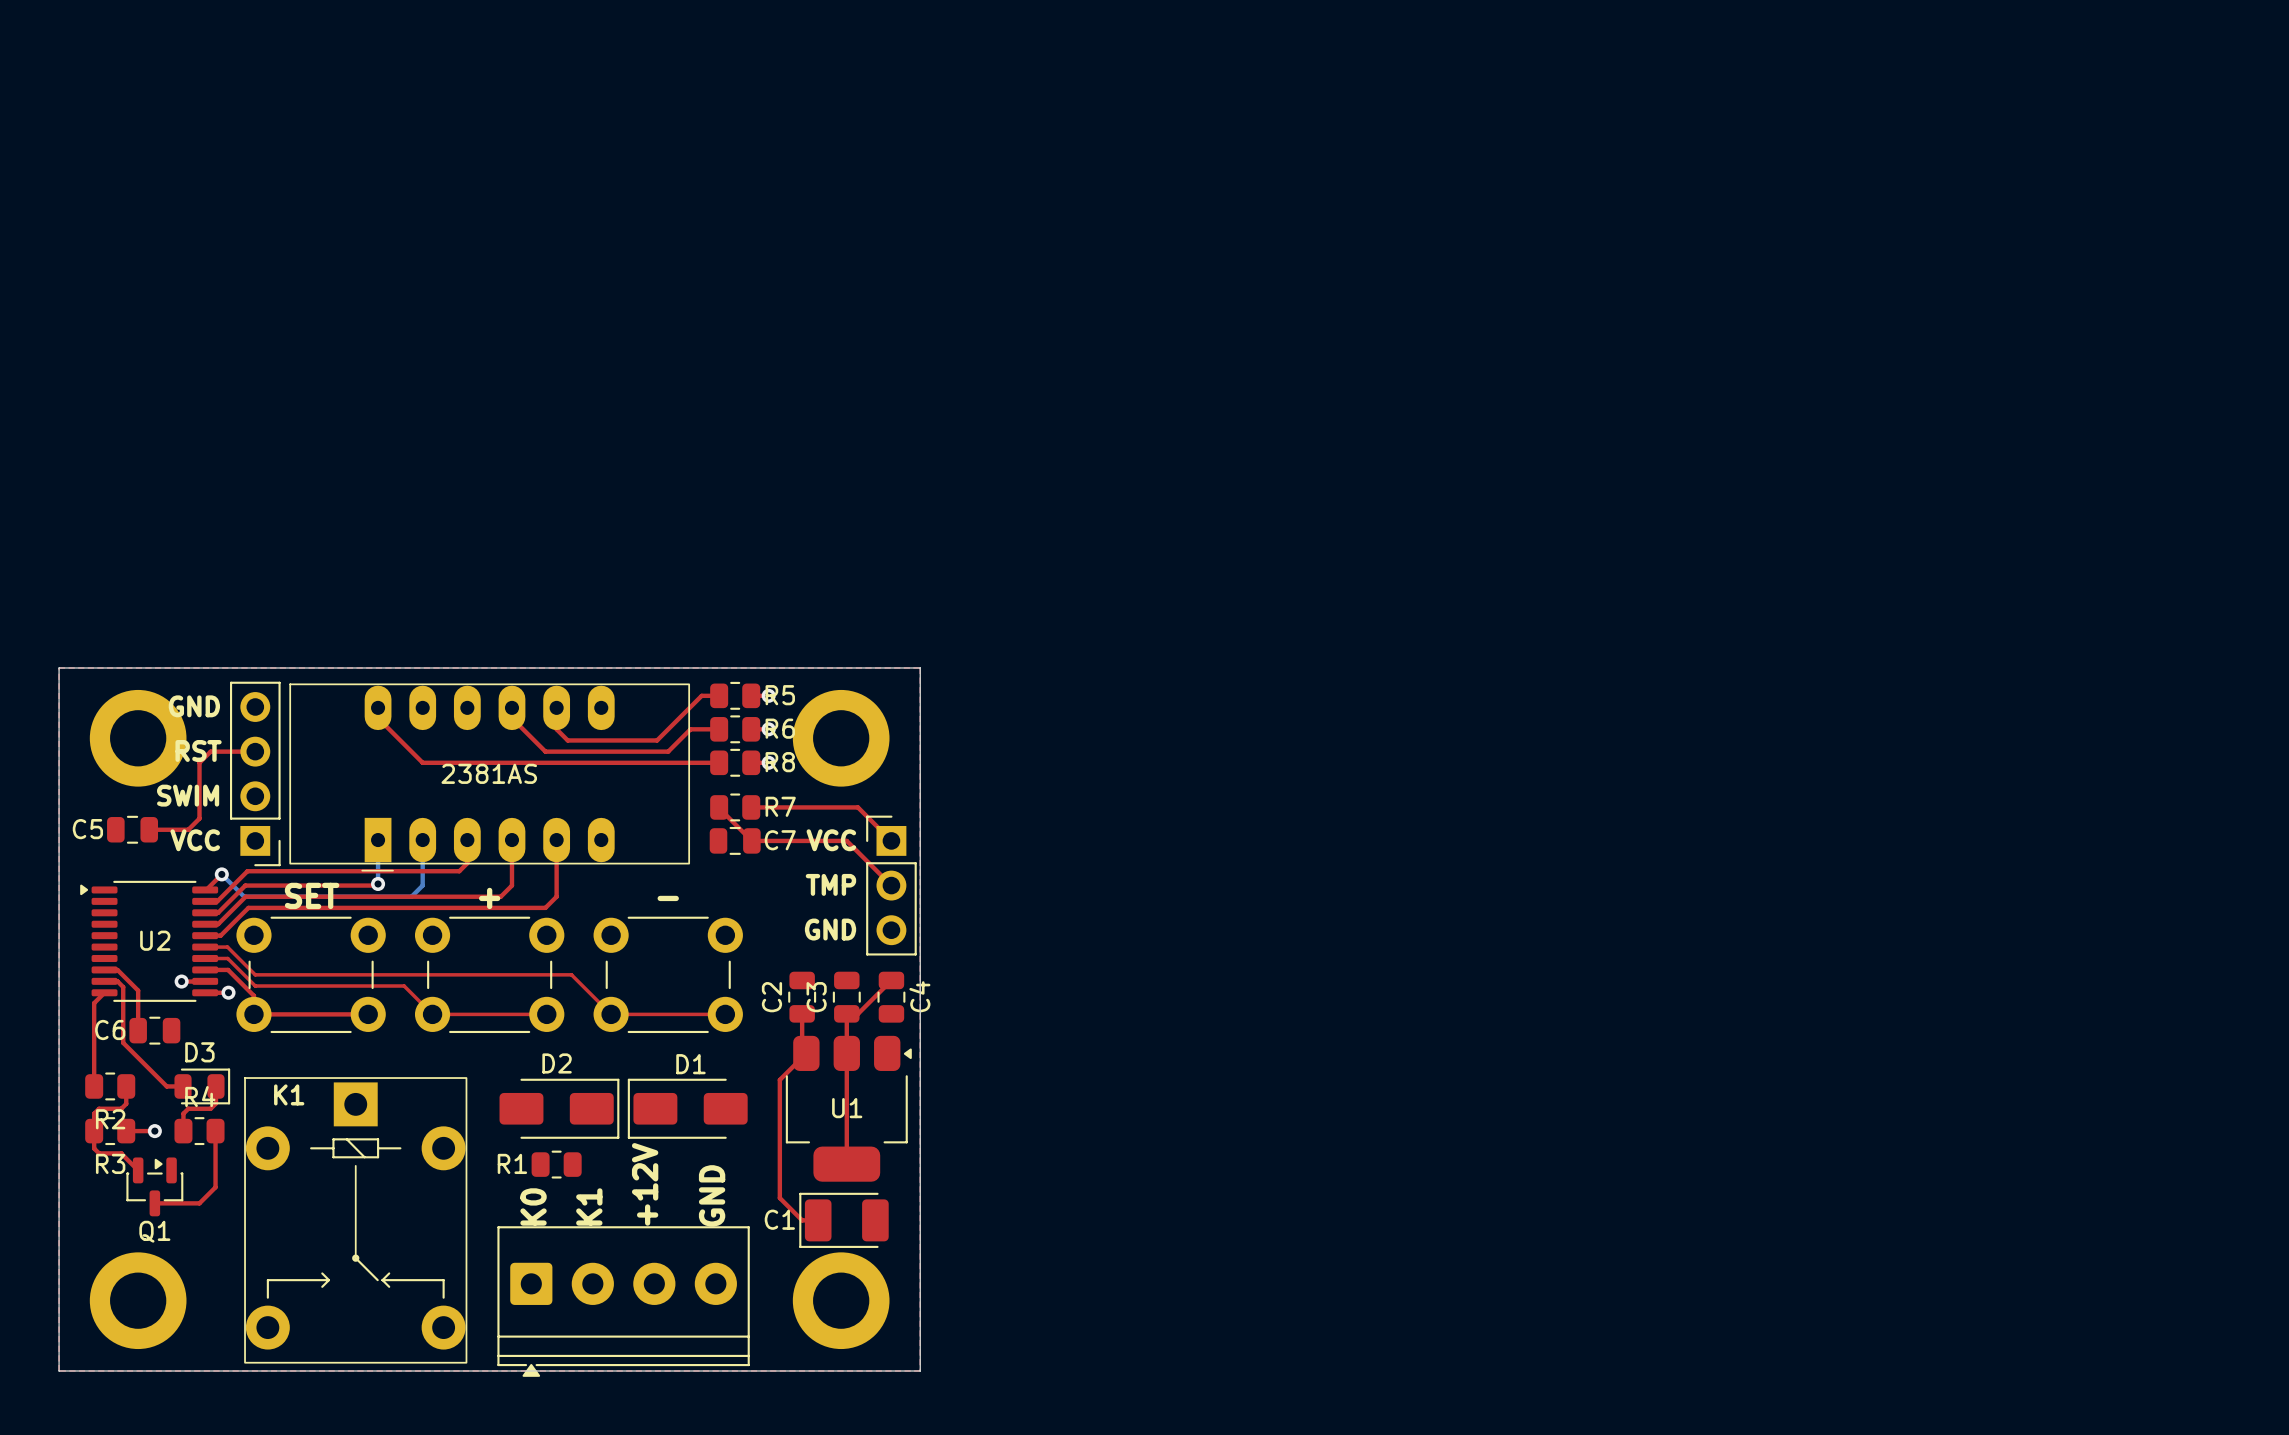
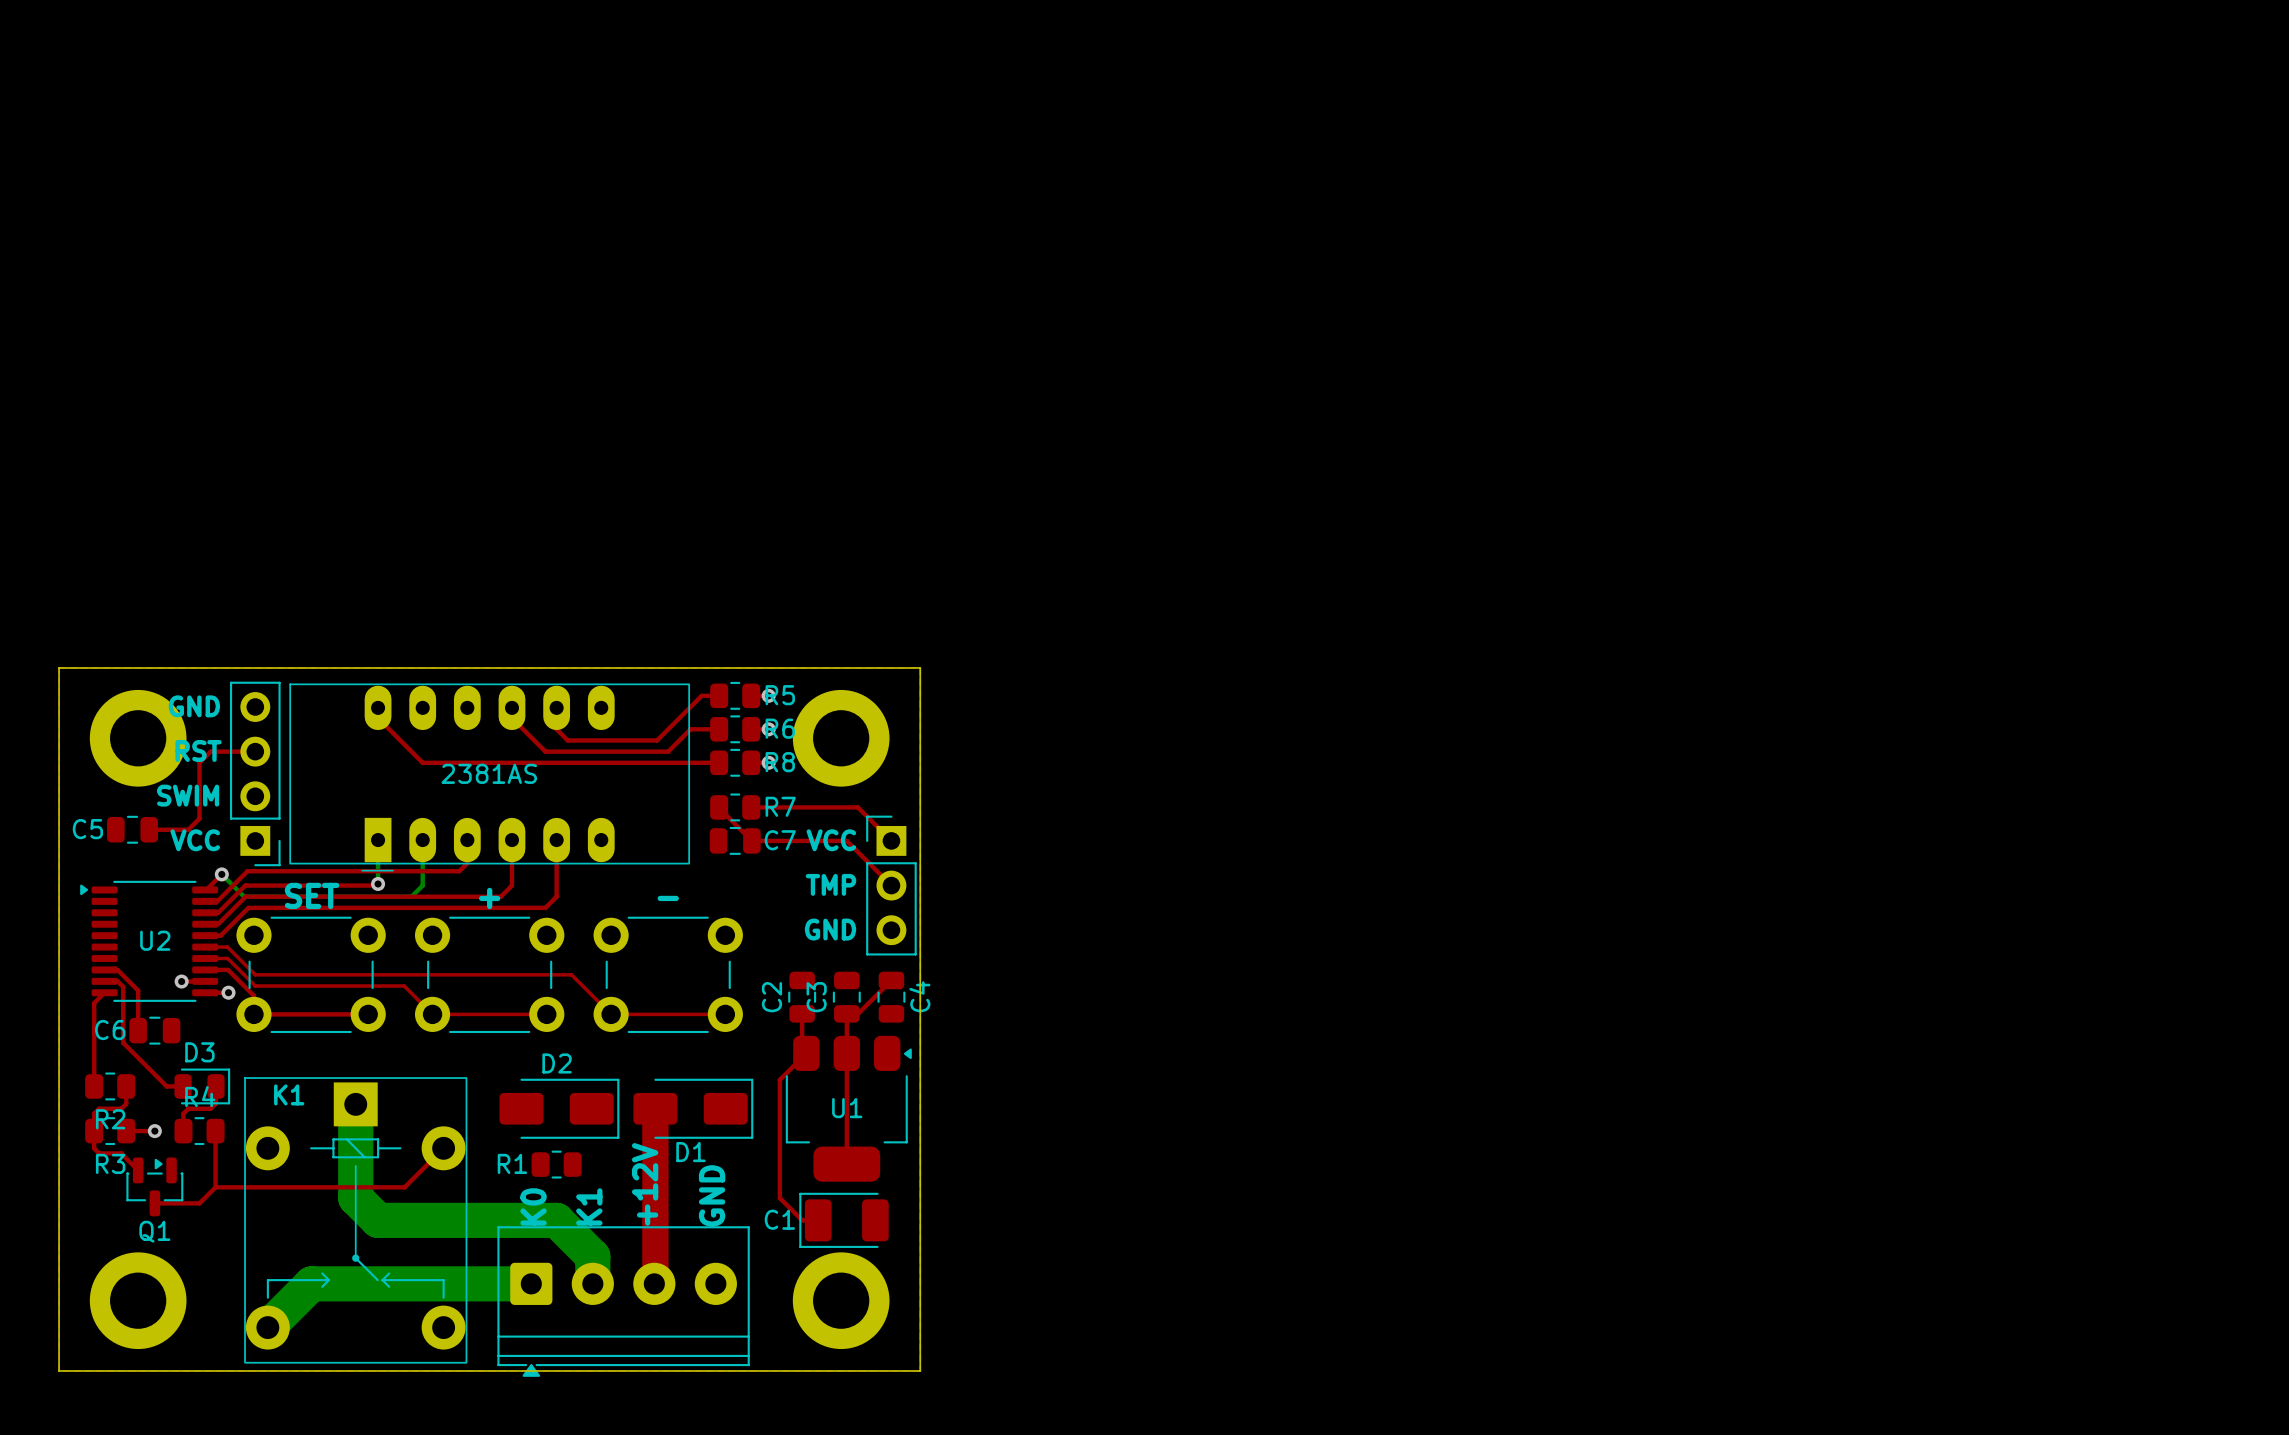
bottom track: none -> (355, 1104) (355, 1198) (378, 1220) (556, 1220) (592, 1256) (592, 1283)
top track: none -> (655, 1108) (654, 1283)
D1 rotation: 0° (687, 1108) -> 180° (693, 1108)
top track: none -> (443, 1148) (404, 1187) (215, 1187)
bottom track: none -> (531, 1283) (311, 1283) (267, 1327)

